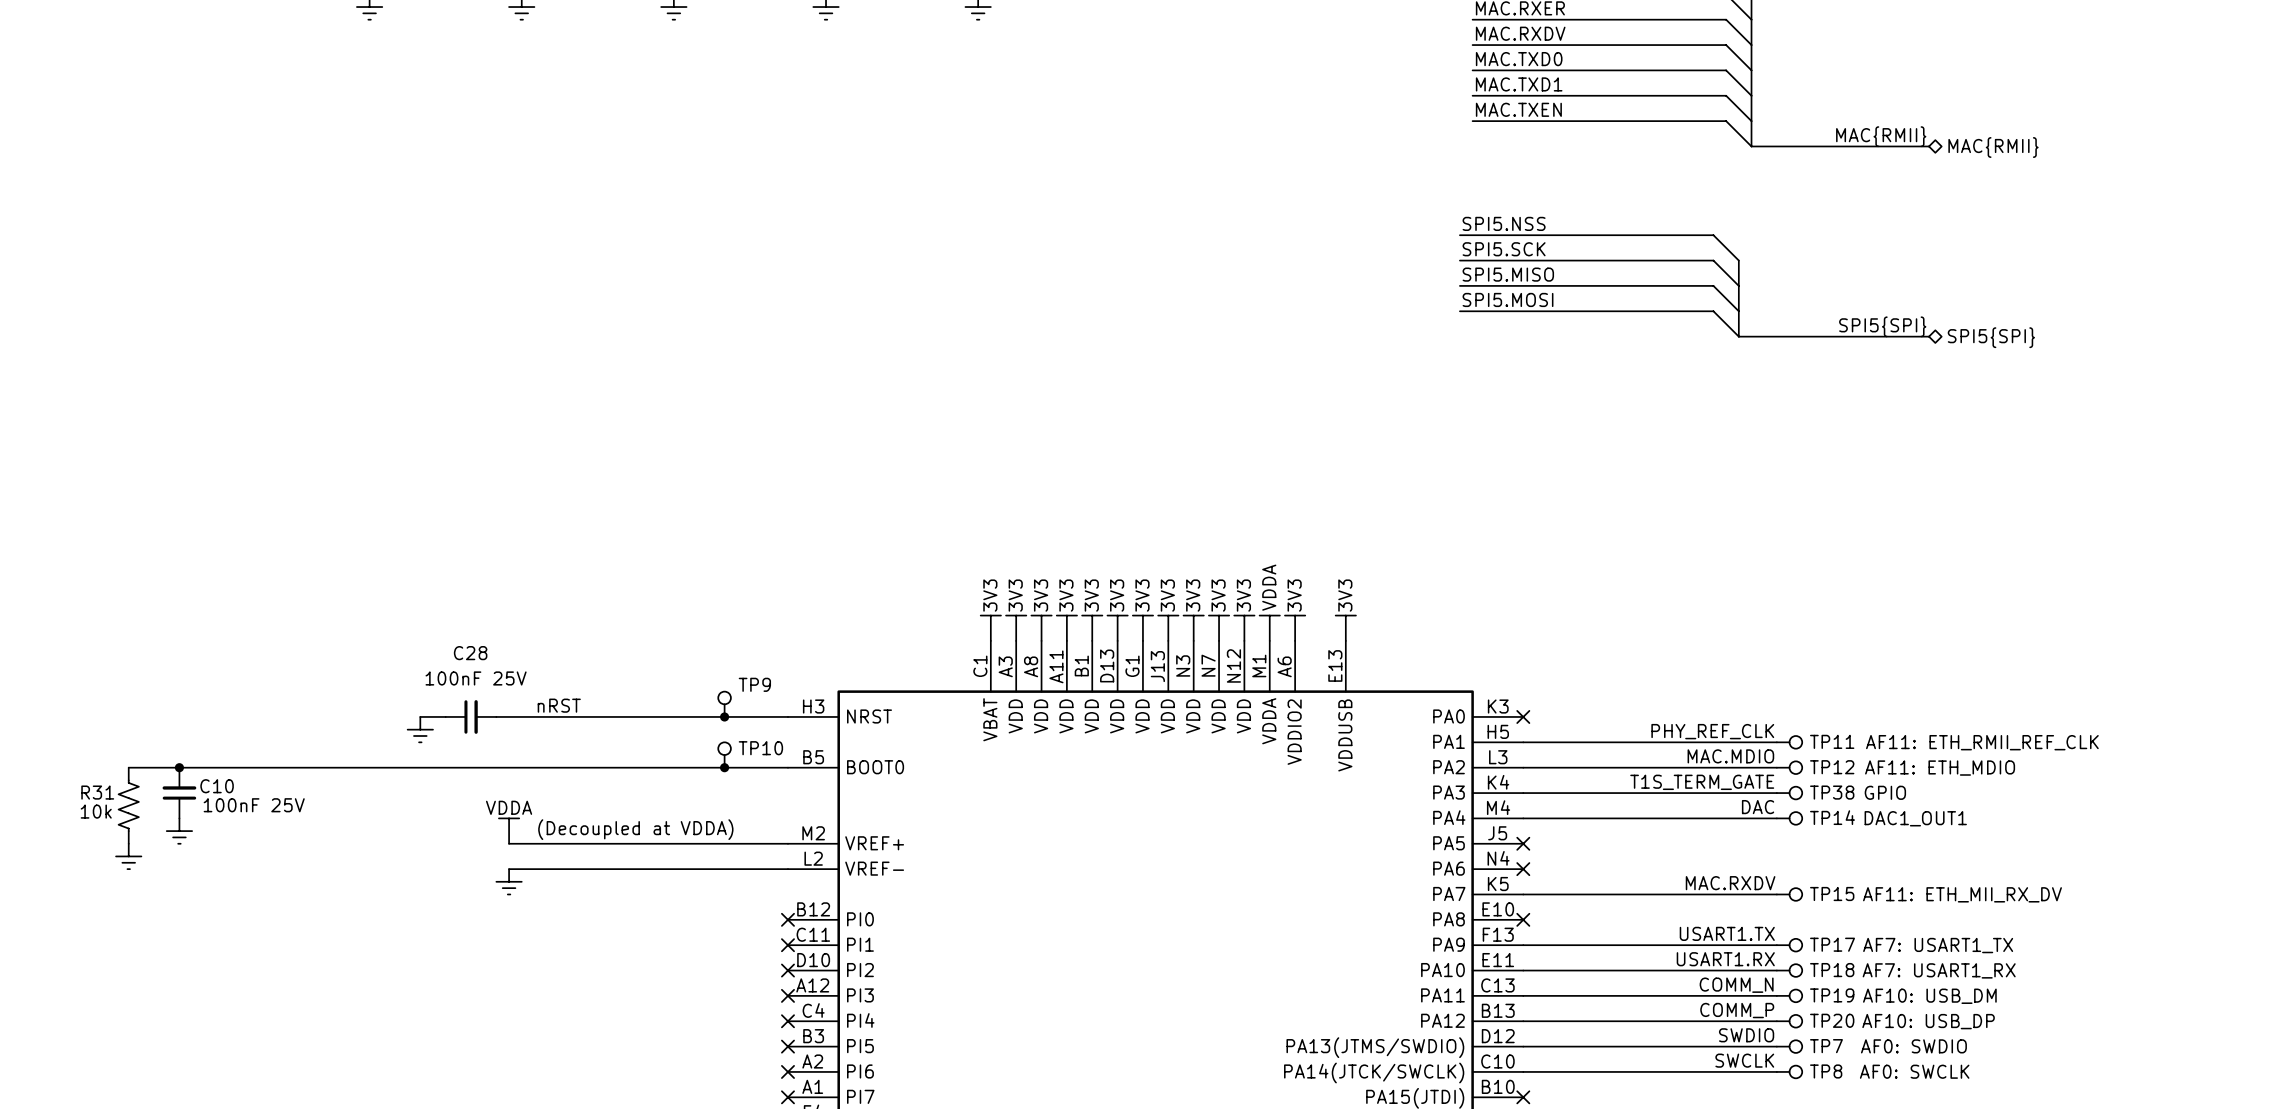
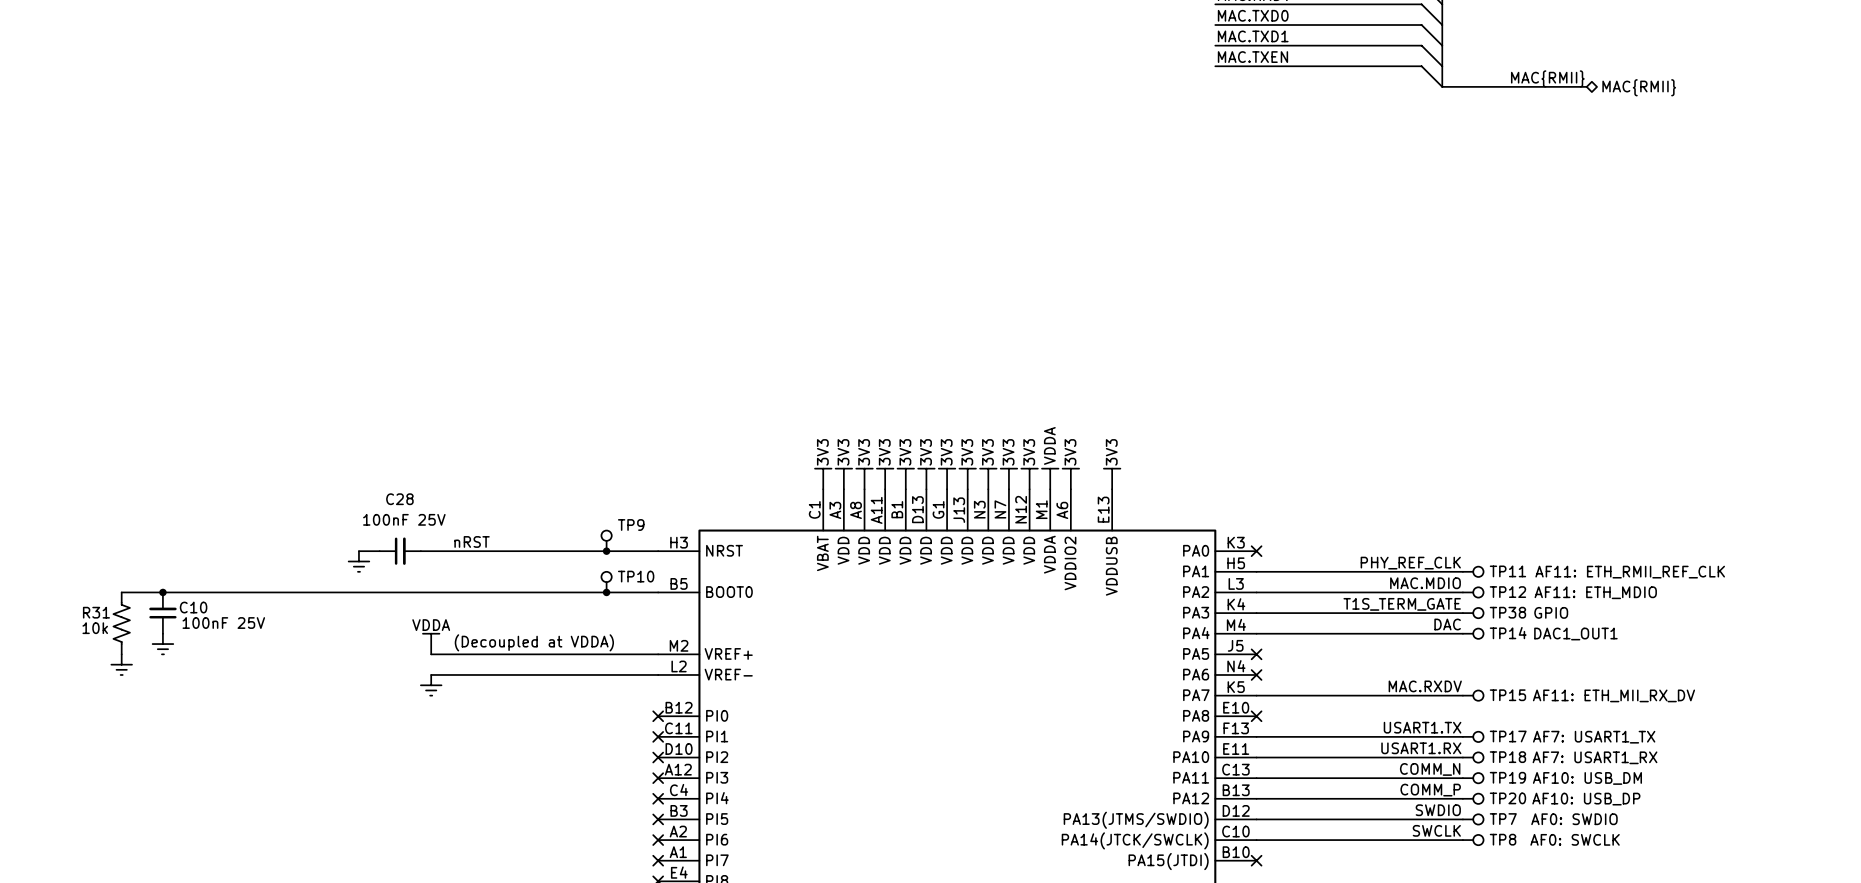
label: SPI5.NSS (1504, 223) -> none
wire: (1459, 235) (1713, 235) (1738, 260) -> none
label: SPI5.SCK (1504, 249) -> none
wire: (1459, 260) (1713, 260) (1738, 285) -> none
bus: (1738, 260) (1738, 336) (1929, 336) -> none
label: SPI5.MISO (1508, 274) -> none
wire: (1459, 285) (1713, 285) (1738, 311) -> none
label: SPI5.MOSI (1508, 299) -> none
wire: (1459, 311) (1713, 311) (1738, 336) -> none
label: SPI5{SPI} (1882, 326) -> none
hierarchical label: SPI5{SPI} (1991, 337) -> none

